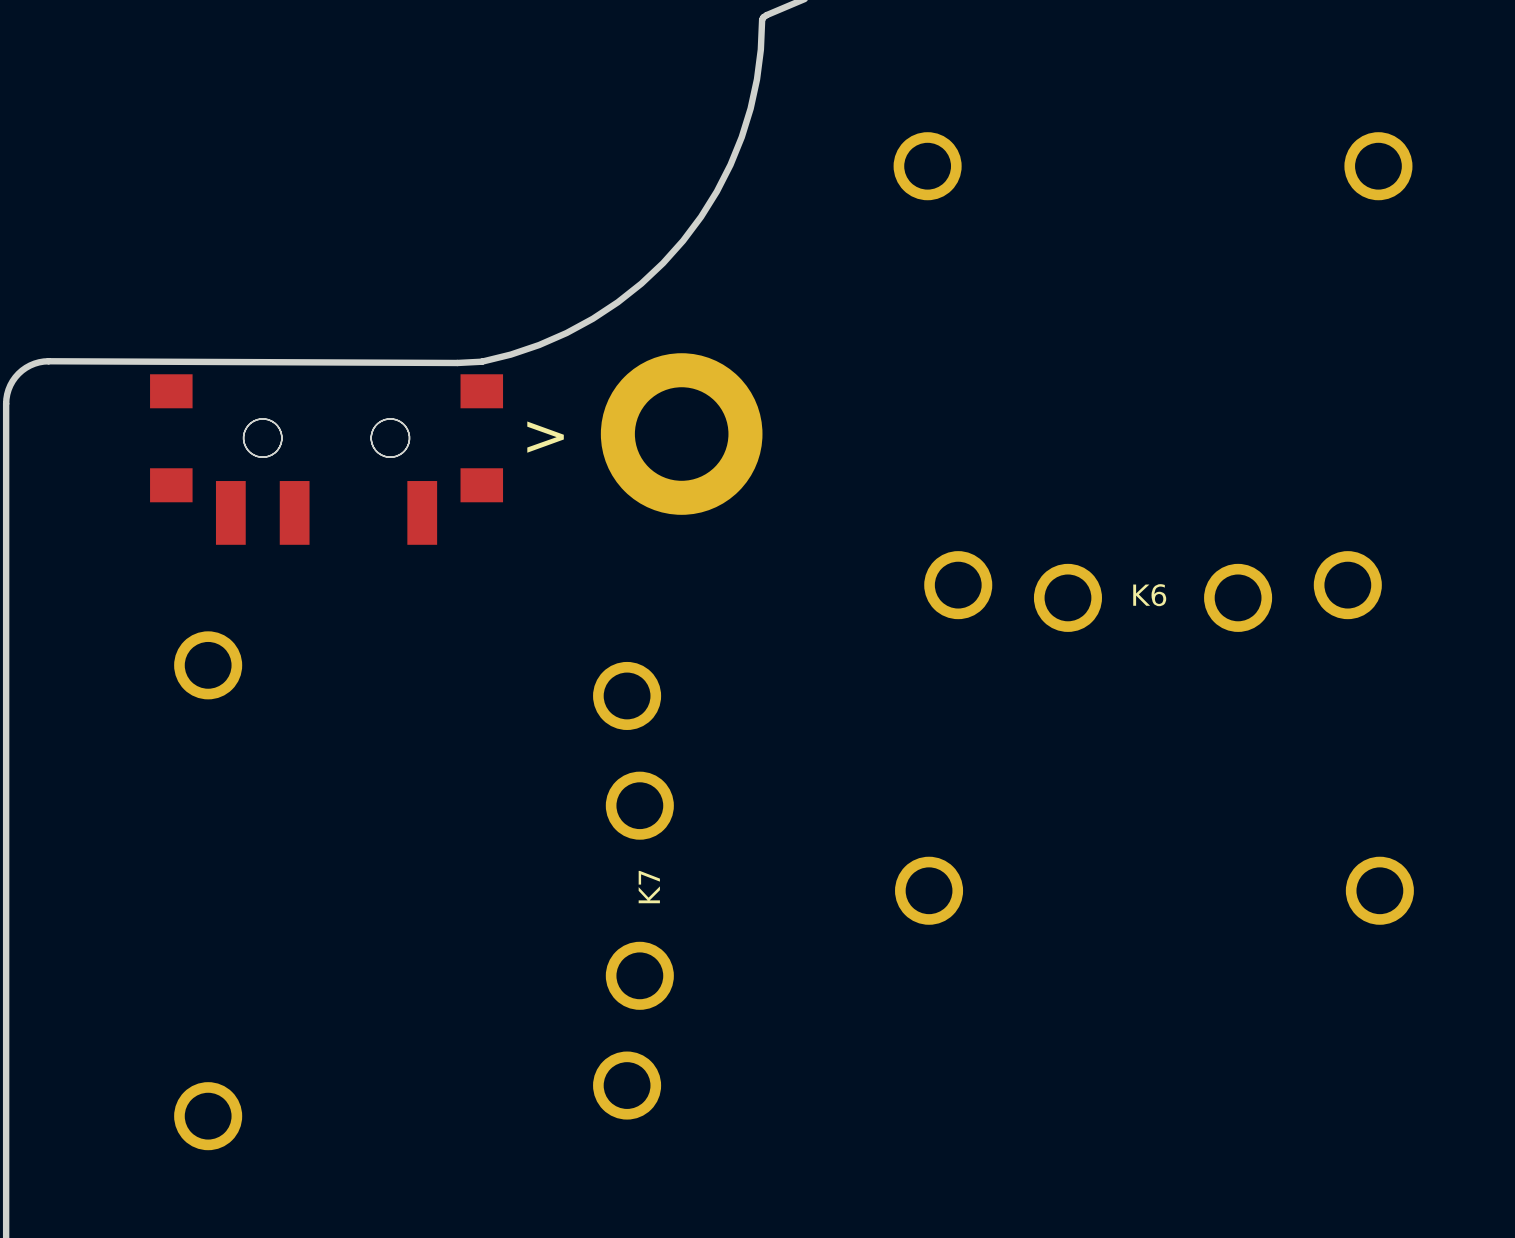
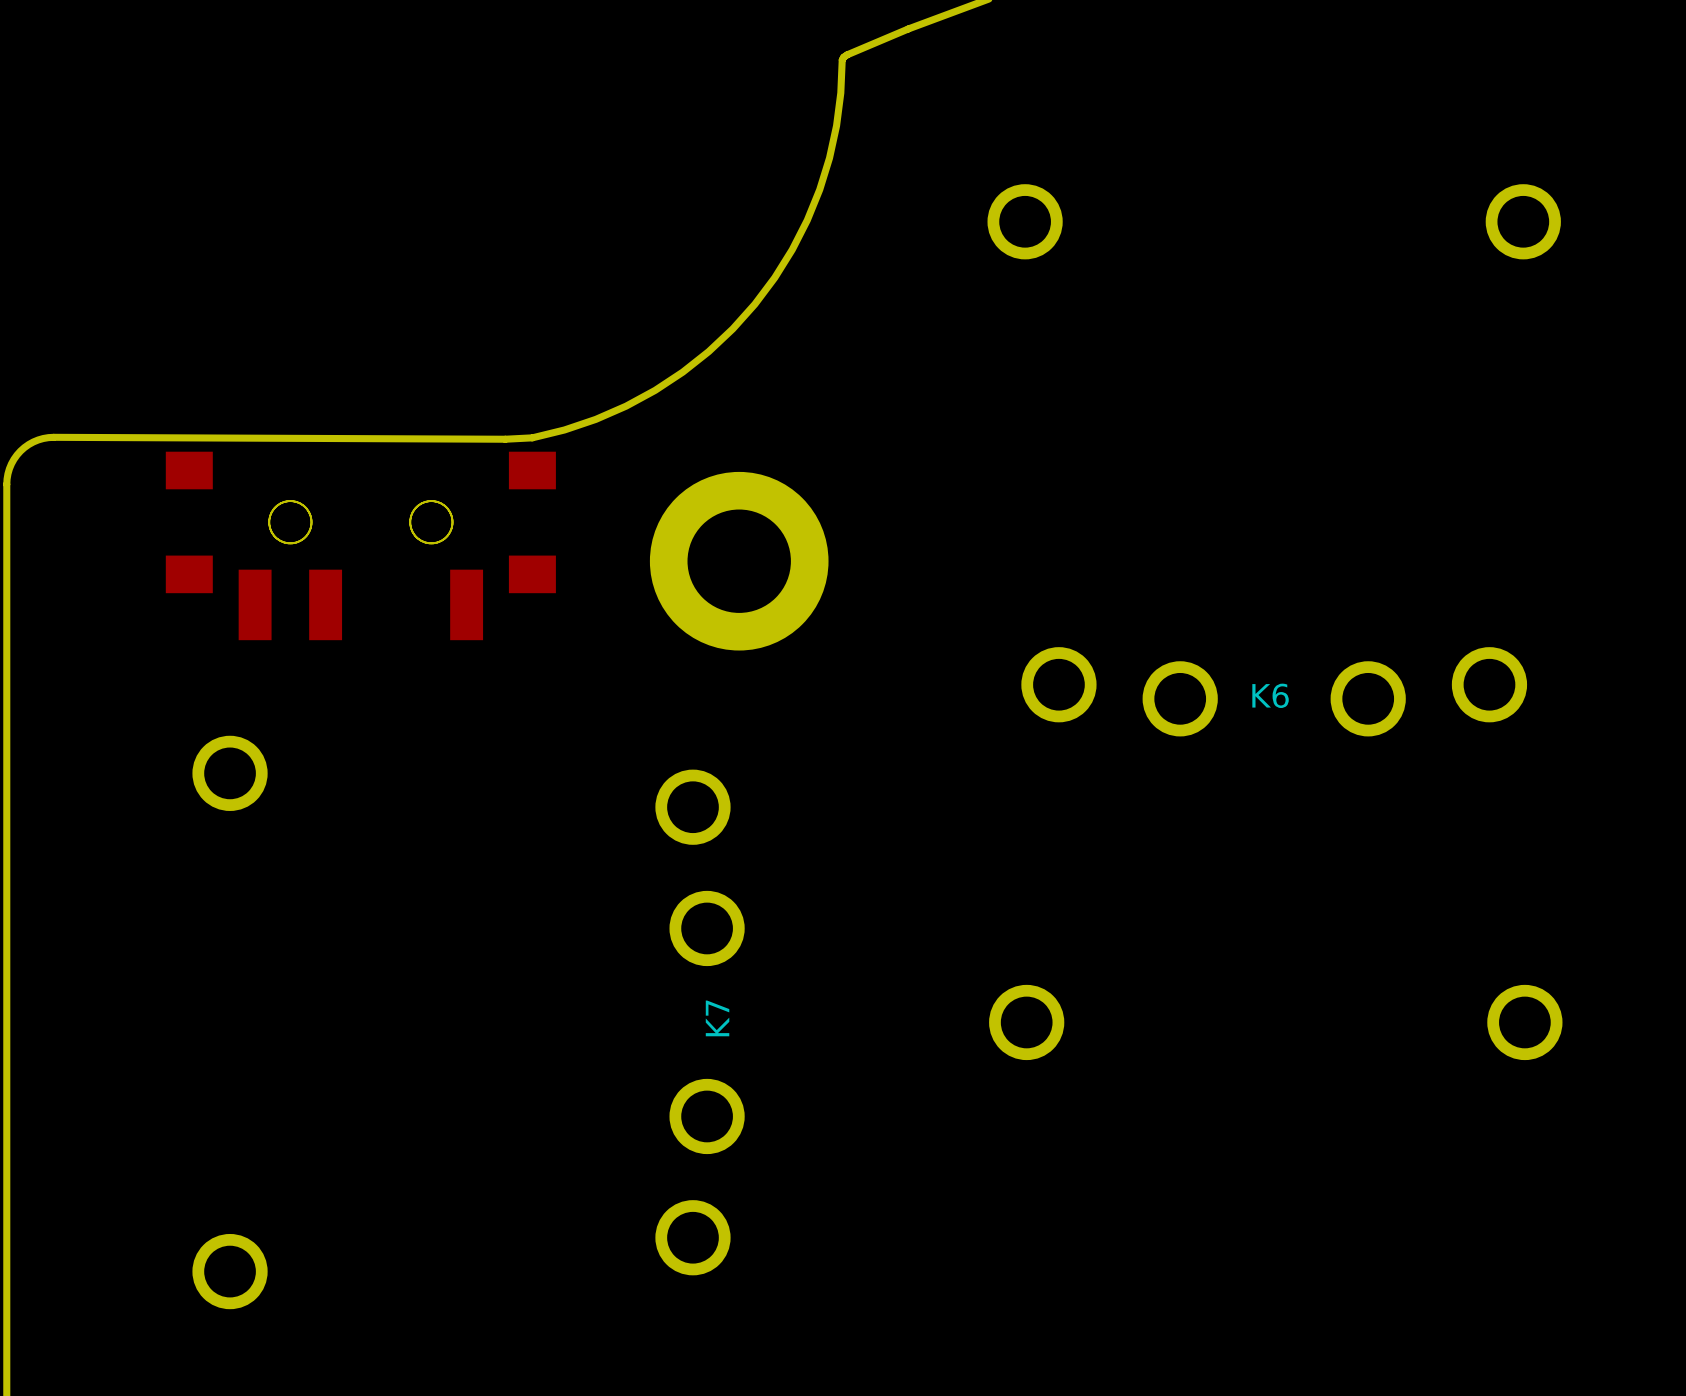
part position: (681, 434) -> (739, 561)
text: > (545, 437) -> none

